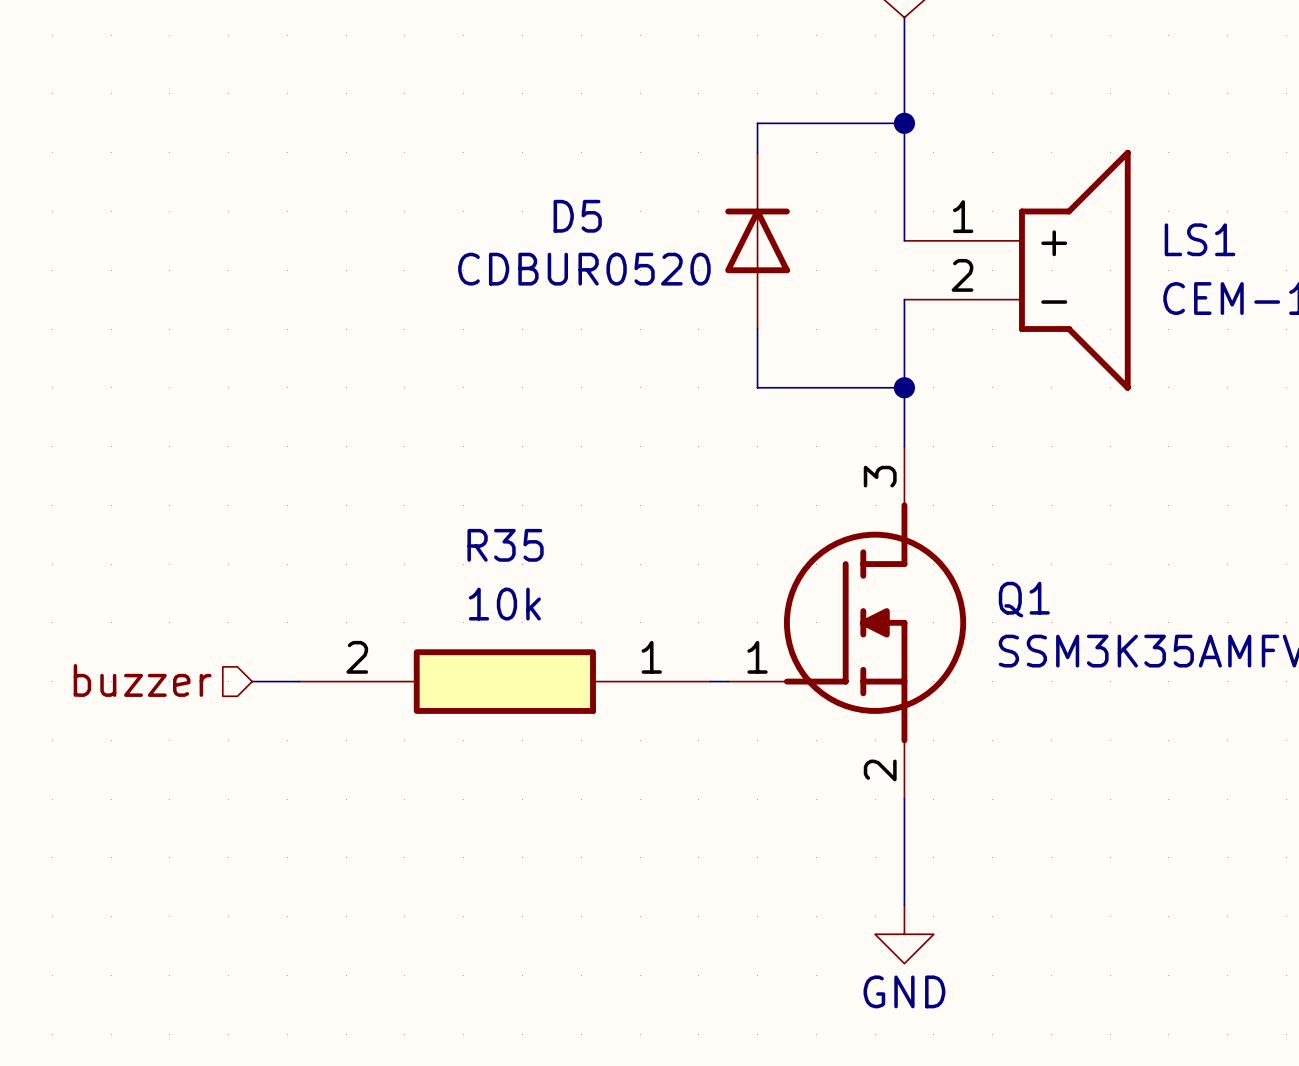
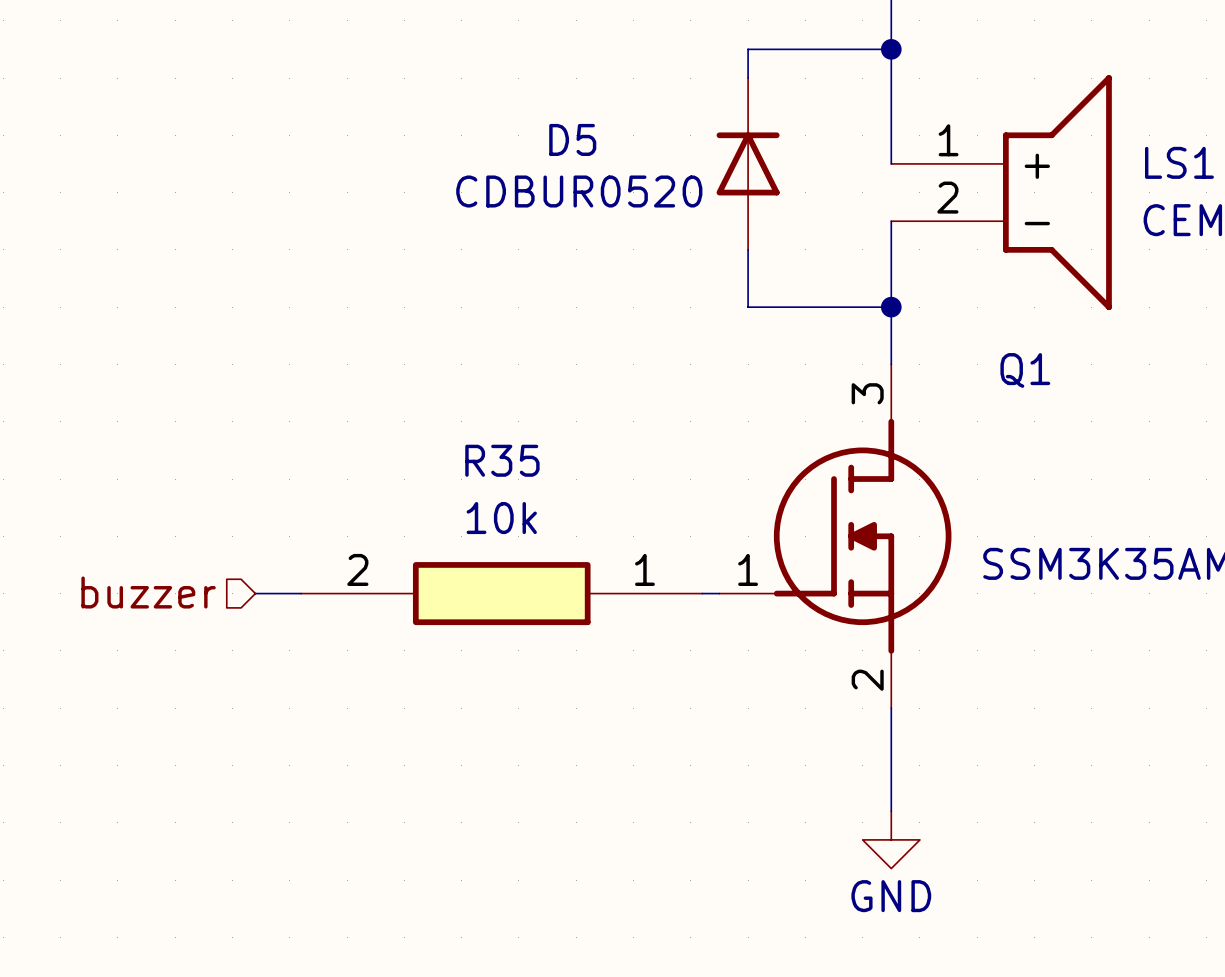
Q1 name position: Q1 (1024, 599) -> Q1 (1025, 370)

